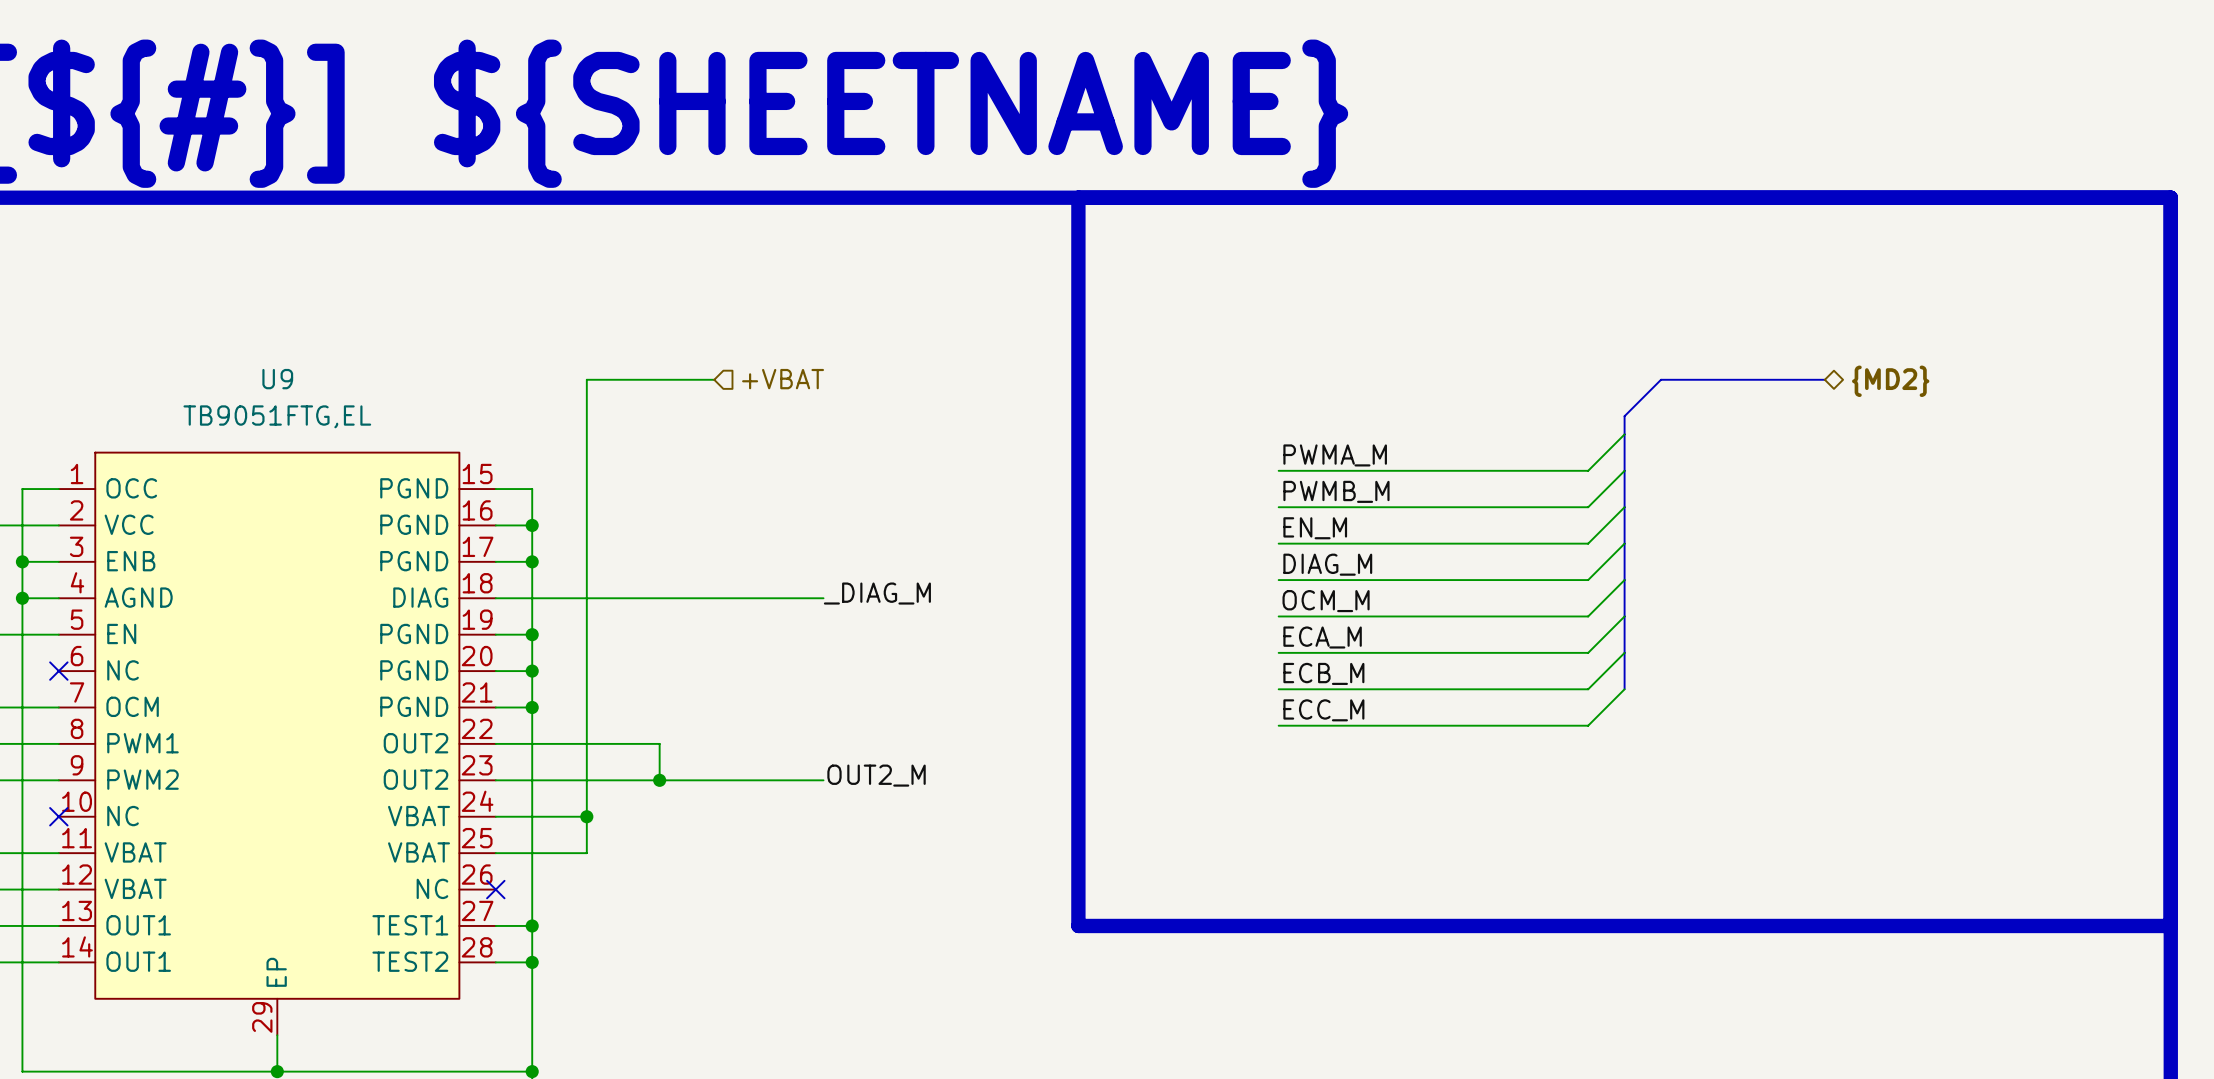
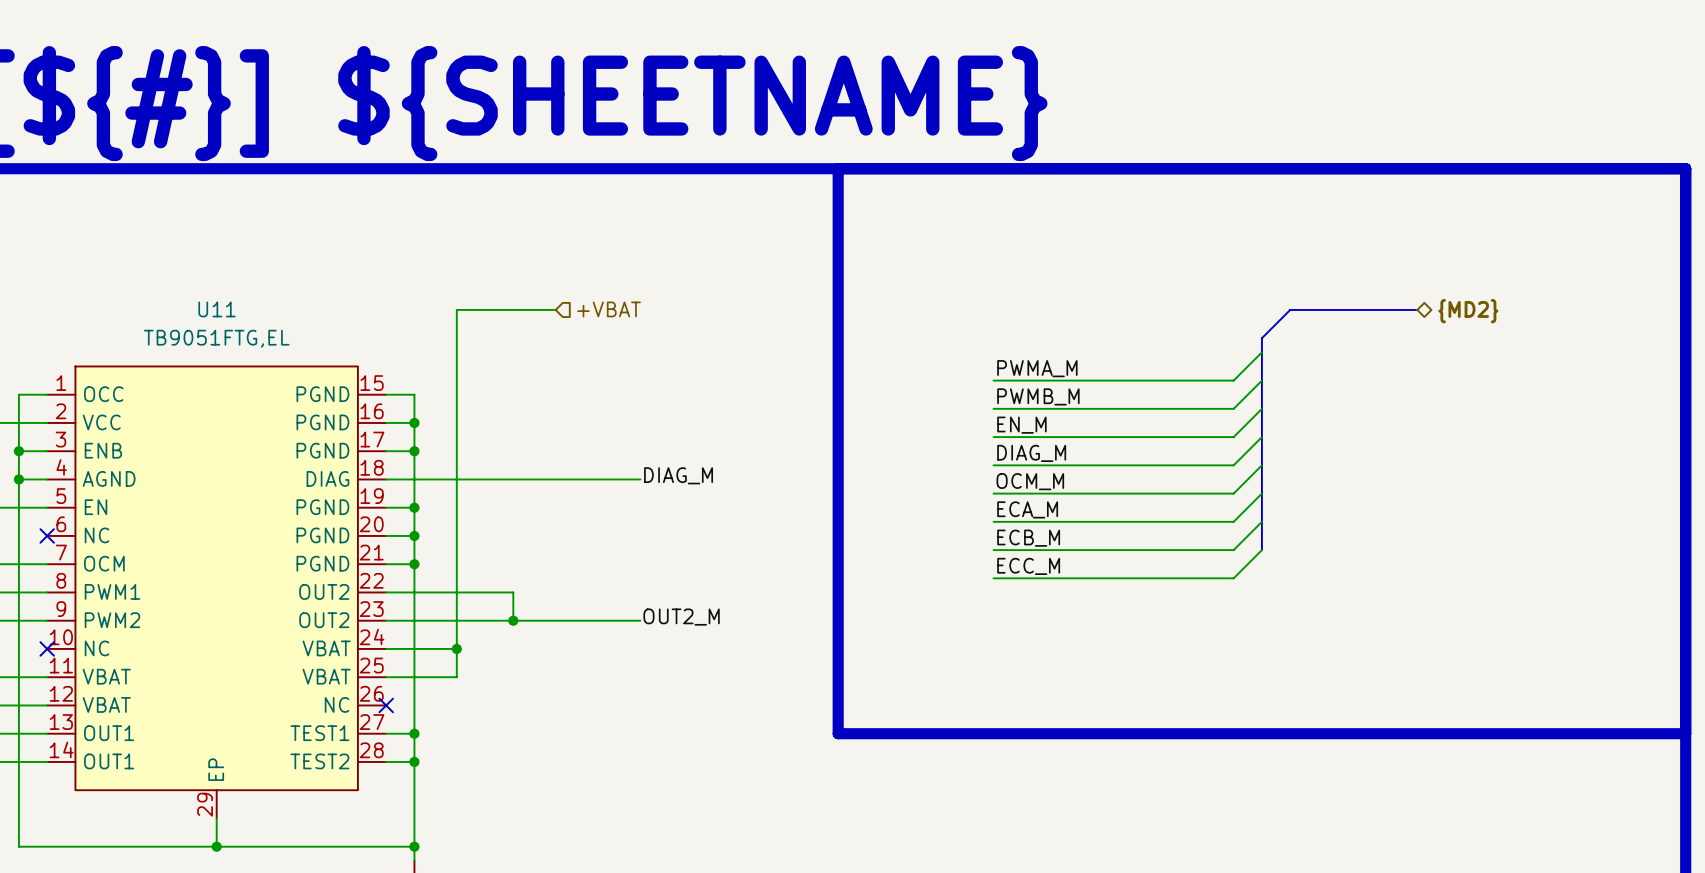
U9 name: U9 (277, 379) -> U11 (217, 309)
label: _DIAG_M (877, 593) -> DIAG_M (678, 475)

